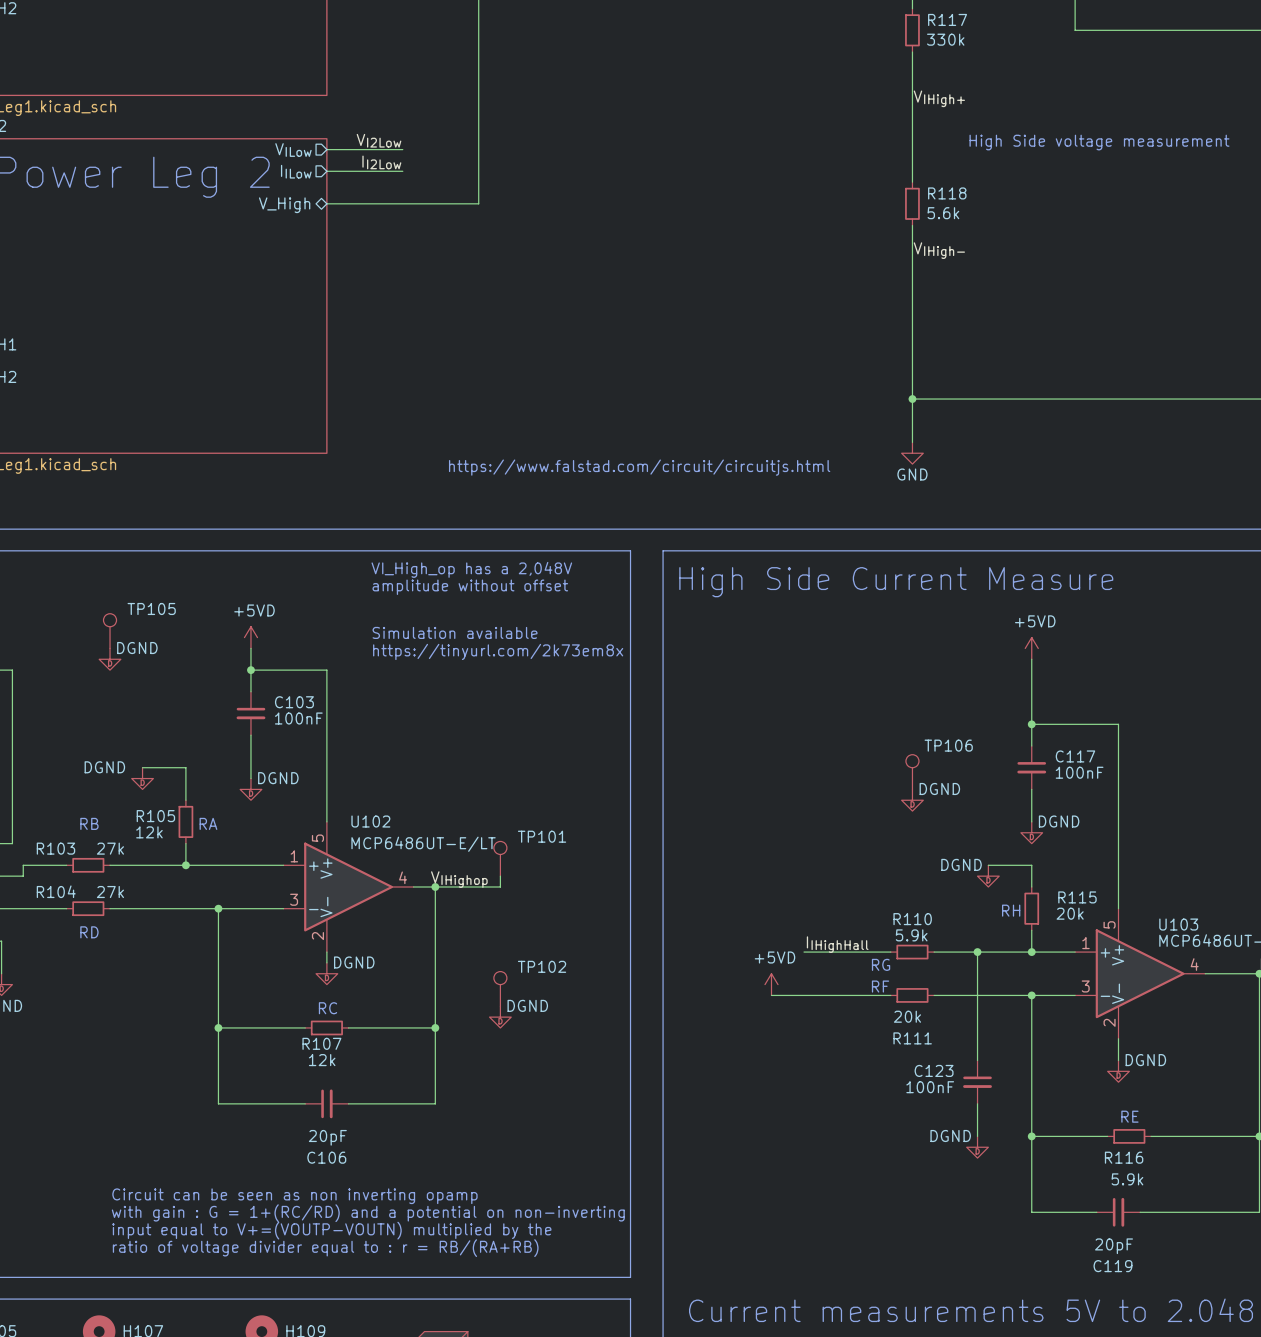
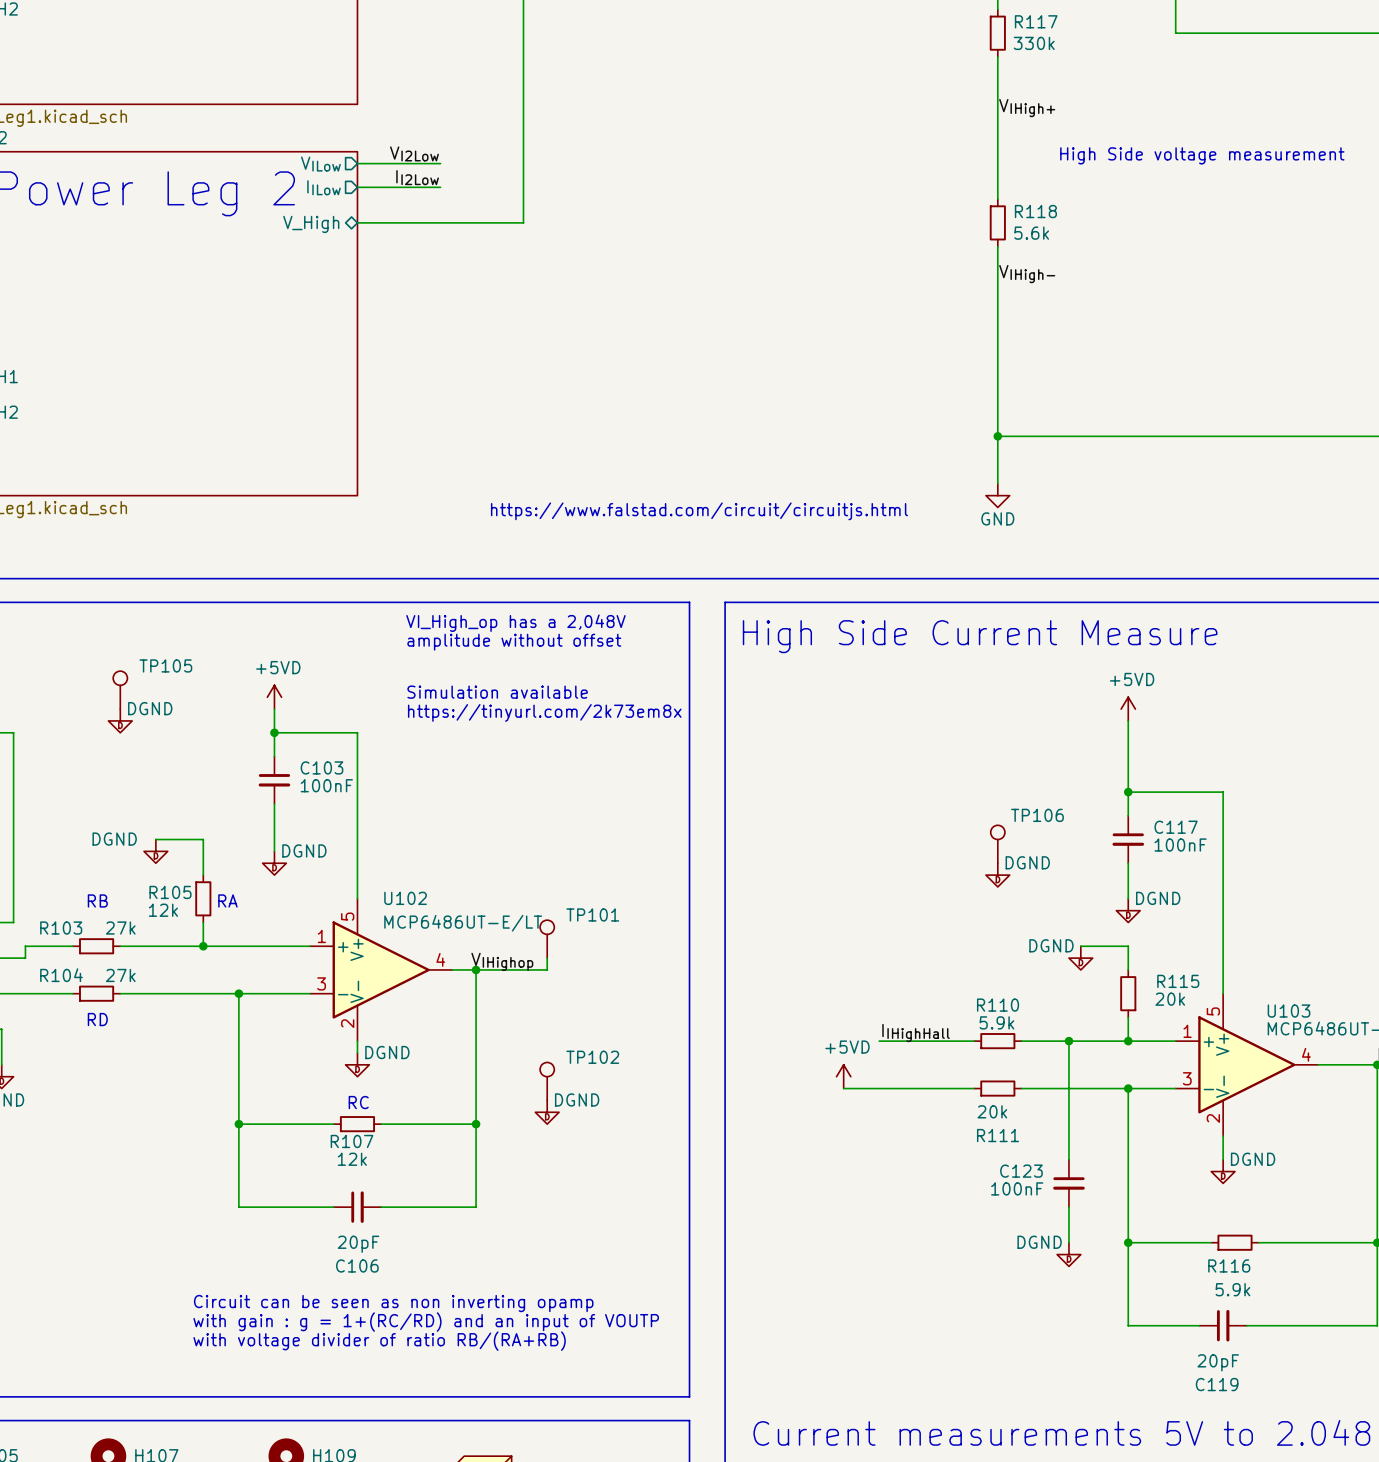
text: RH (1011, 910) -> none
text: RG (881, 964) -> none
text: RF (880, 986) -> none
text: RE (1129, 1116) -> none
text position: Circuit can be seen as non inverting opamp (294, 1196) -> Circuit can be seen as non inverting opamp (393, 1303)
text: with gain : G = 1+(RC/RD) and a potential on non-inverting (368, 1213) -> with gain : g = 1+(RC/RD) and an input of VOUTP (426, 1322)
text: input equal to V+=(VOUTP-VOUTN) multiplied by the (331, 1230) -> none
text: ratio of voltage divider equal to : r = RB/(RA+RB) (325, 1248) -> with voltage divider of ratio RB/(RA+RB) (379, 1341)

